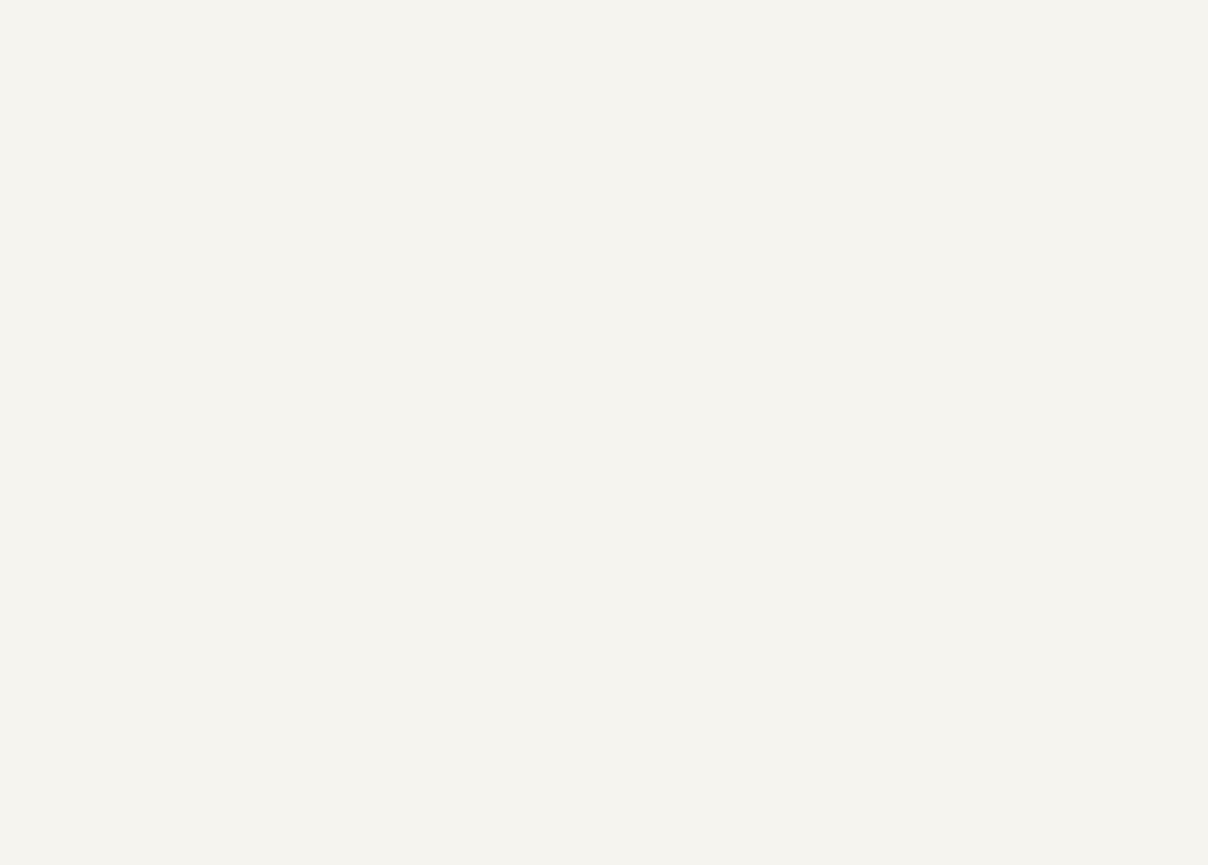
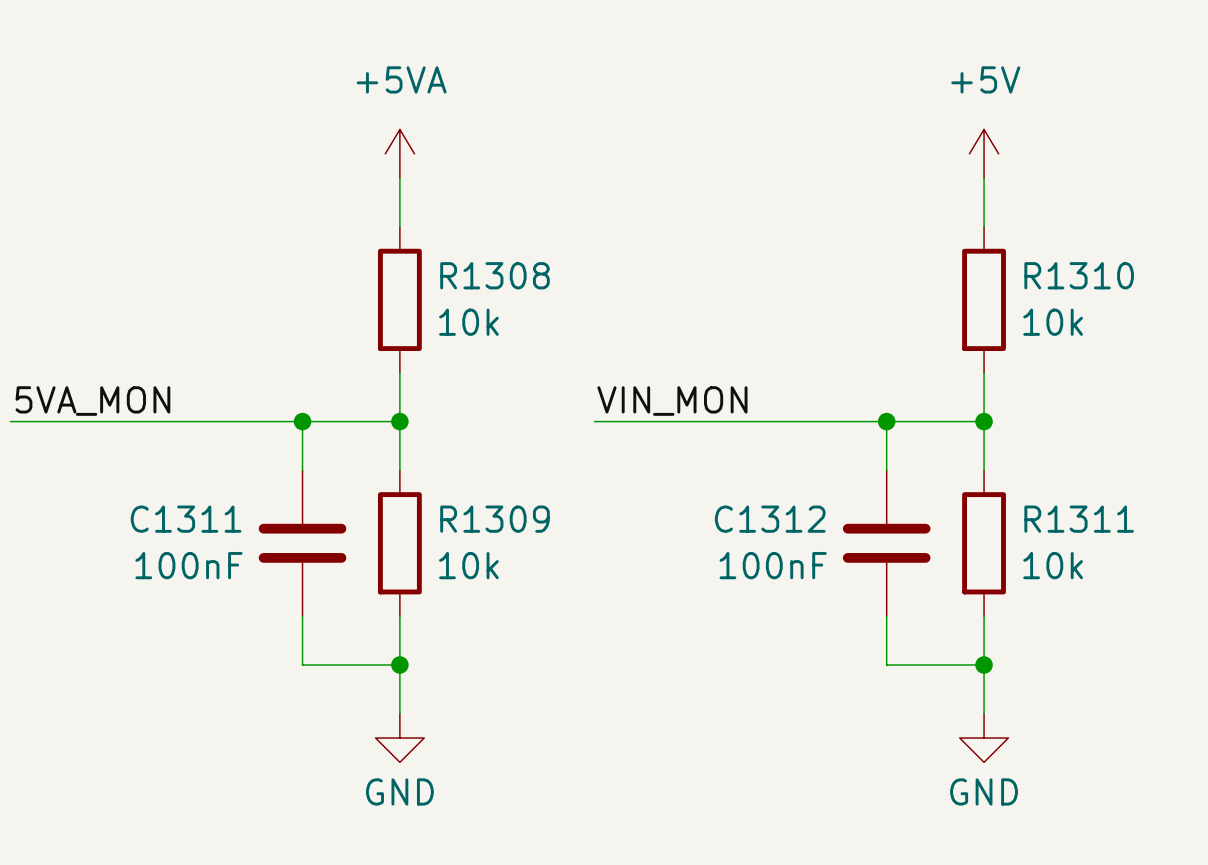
power symbol: none -> +5VA (399, 153)
power symbol: none -> +5V (984, 153)
wire: none -> (399, 178) (399, 226)
wire: none -> (984, 178) (984, 226)
R1308: none -> 10k (399, 299)
R1310: none -> 10k (984, 299)
wire: none -> (399, 372) (399, 470)
wire: none -> (984, 372) (984, 470)
label: none -> 5VA_MON (92, 401)
label: none -> VIN_MON (672, 401)
wire: none -> (10, 421) (399, 421)
wire: none -> (302, 421) (302, 470)
junction: none -> (302, 421)
junction: none -> (399, 421)
wire: none -> (594, 421) (984, 421)
wire: none -> (886, 421) (886, 470)
junction: none -> (886, 421)
junction: none -> (984, 421)
C1311: none -> 100nF (302, 543)
R1309: none -> 10k (399, 543)
C1312: none -> 100nF (886, 543)
R1311: none -> 10k (984, 543)
wire: none -> (302, 616) (302, 664) (399, 664)
wire: none -> (399, 616) (399, 713)
wire: none -> (886, 616) (886, 664) (984, 664)
wire: none -> (984, 616) (984, 713)
junction: none -> (399, 664)
junction: none -> (984, 664)
power symbol: none -> GND (399, 738)
power symbol: none -> GND (984, 738)

